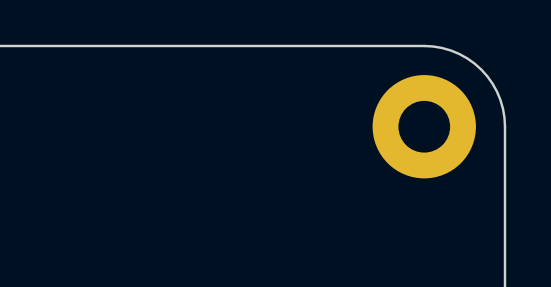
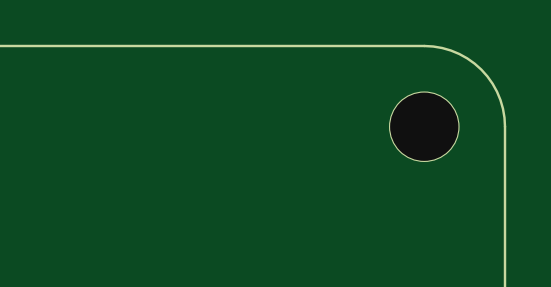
part footprint: [372, 75, 476, 179] -> [389, 92, 459, 162]

